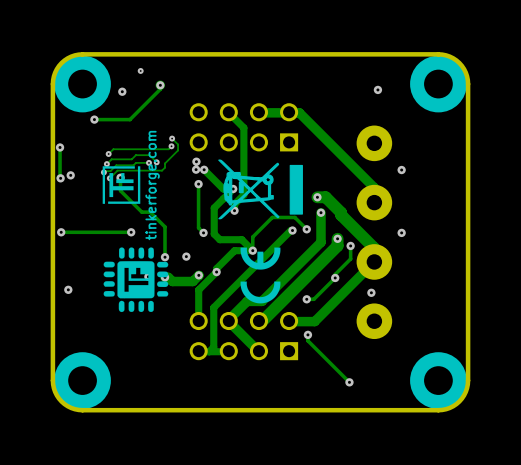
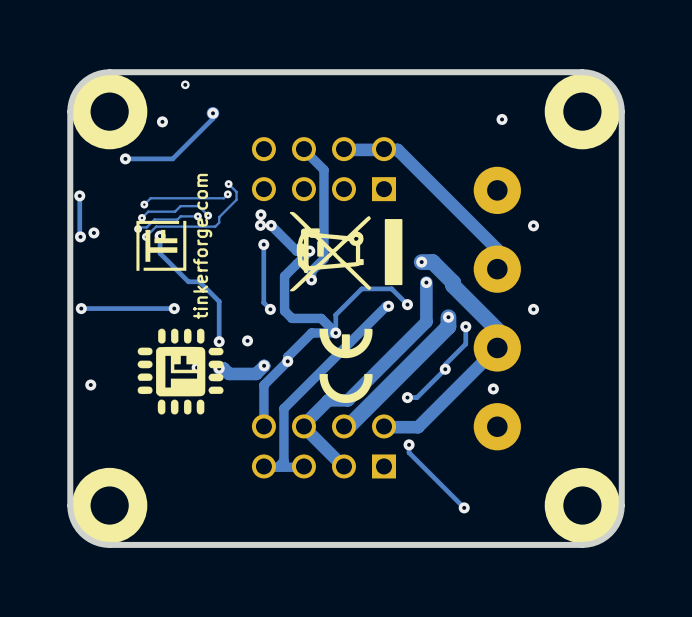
via: none -> (185, 84)
via: (140, 70) -> none

